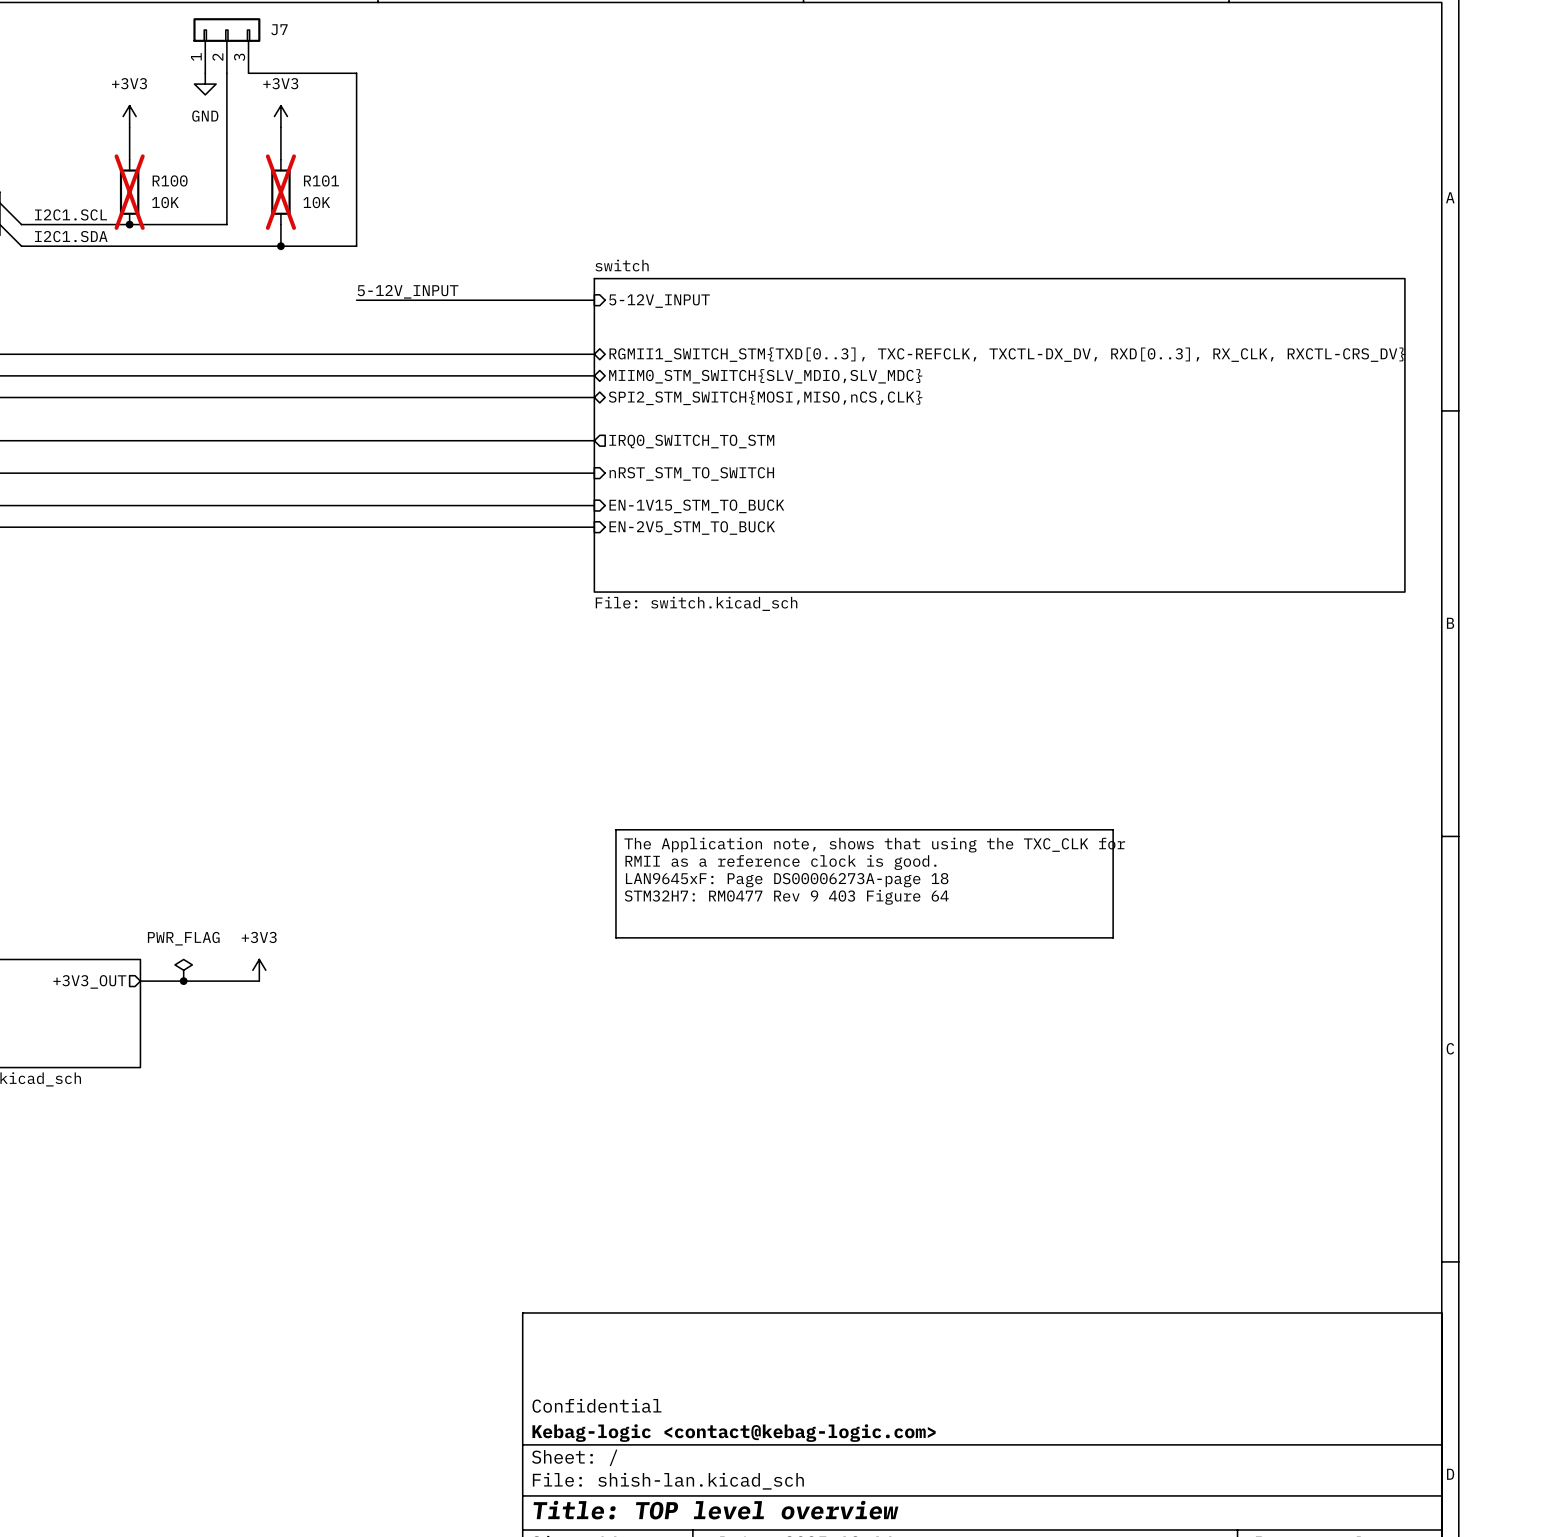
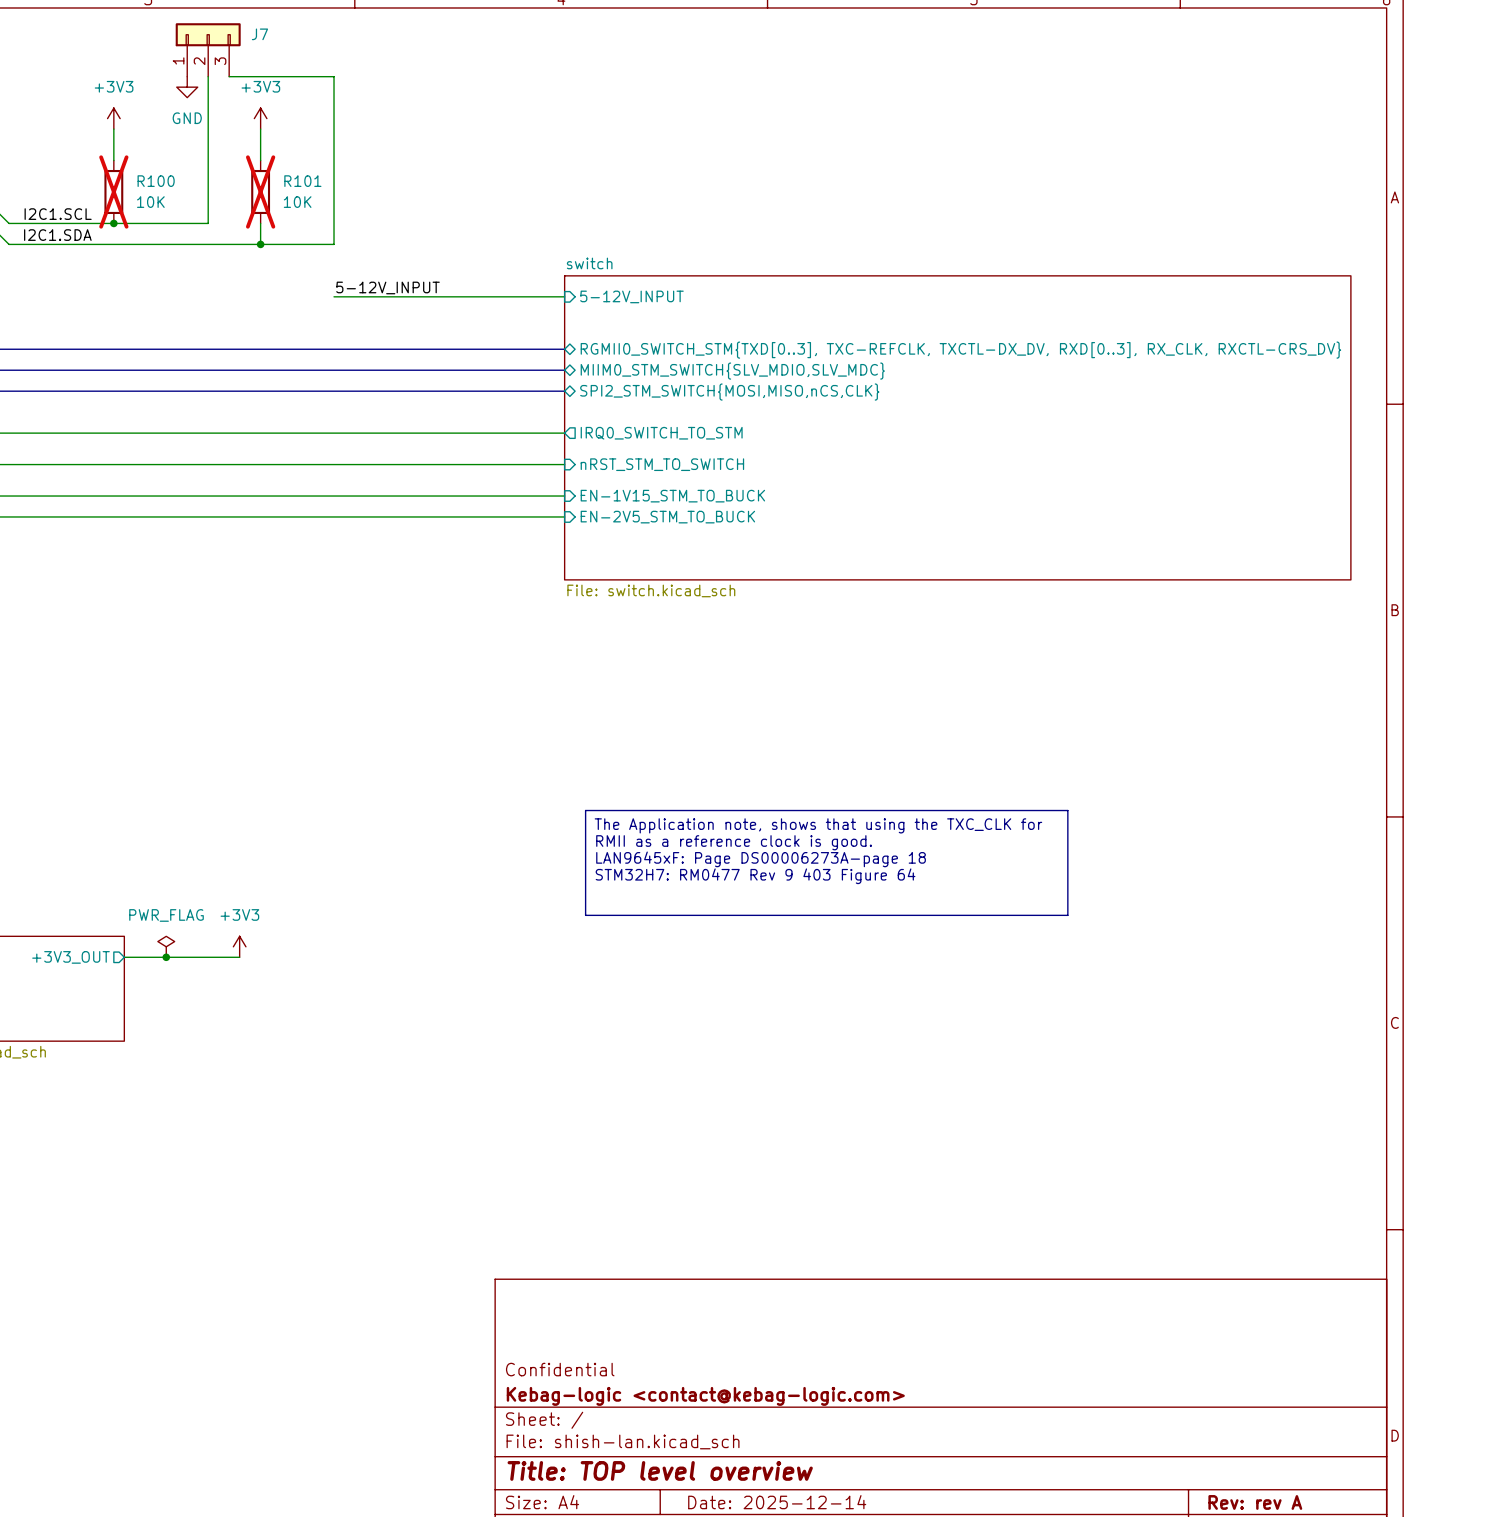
sheet pin: RGMII1_SWITCH_STM{TXD[0..3], TXC-REFCLK, TXCTL-DX_DV, RXD[0..3], RX_CLK, RXCTL-CRS_DV} (1007, 354) -> RGMII0_SWITCH_STM{TXD[0..3], TXC-REFCLK, TXCTL-DX_DV, RXD[0..3], RX_CLK, RXCTL-CRS_DV} (960, 350)

